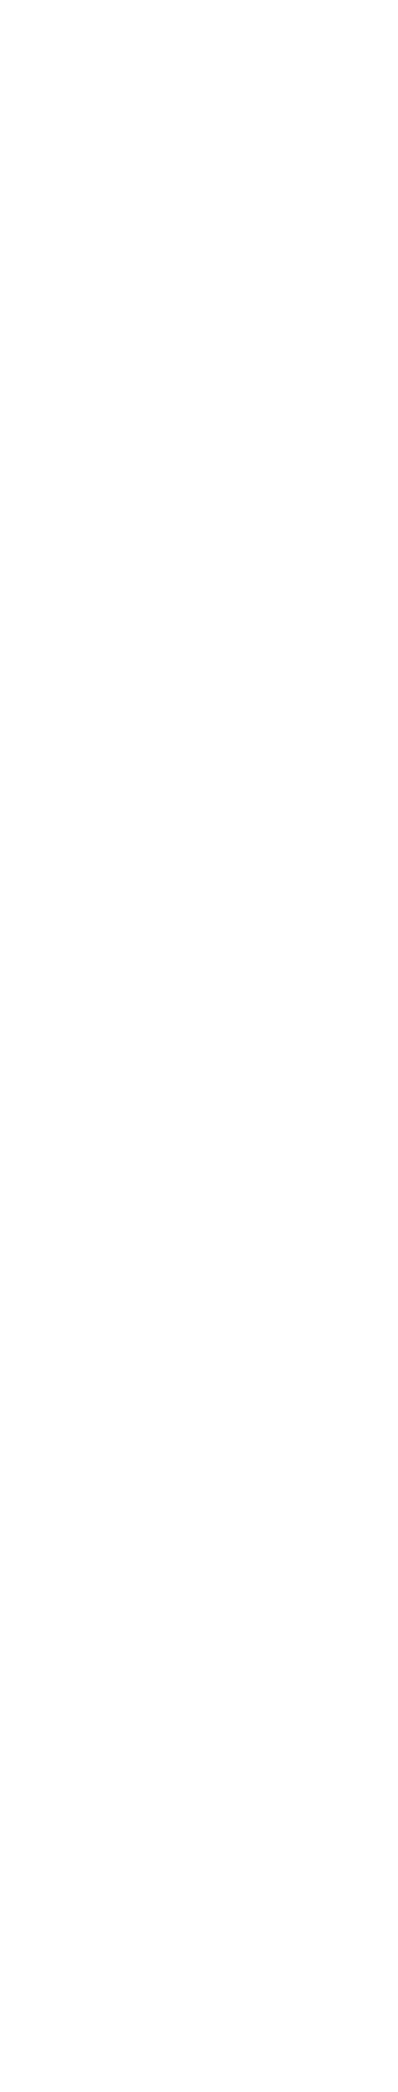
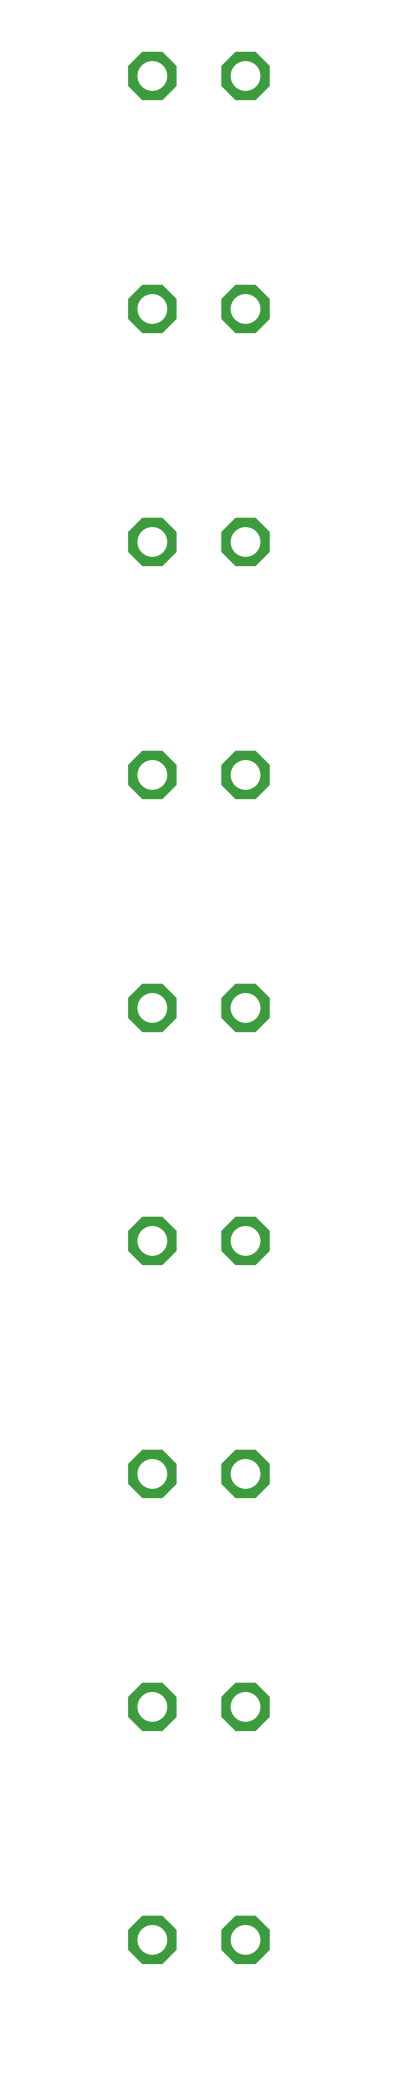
part: none -> (198, 75)
part: none -> (198, 308)
part: none -> (198, 541)
part: none -> (198, 774)
part: none -> (198, 1007)
part: none -> (198, 1240)
part: none -> (198, 1473)
part: none -> (198, 1706)
part: none -> (198, 1939)

